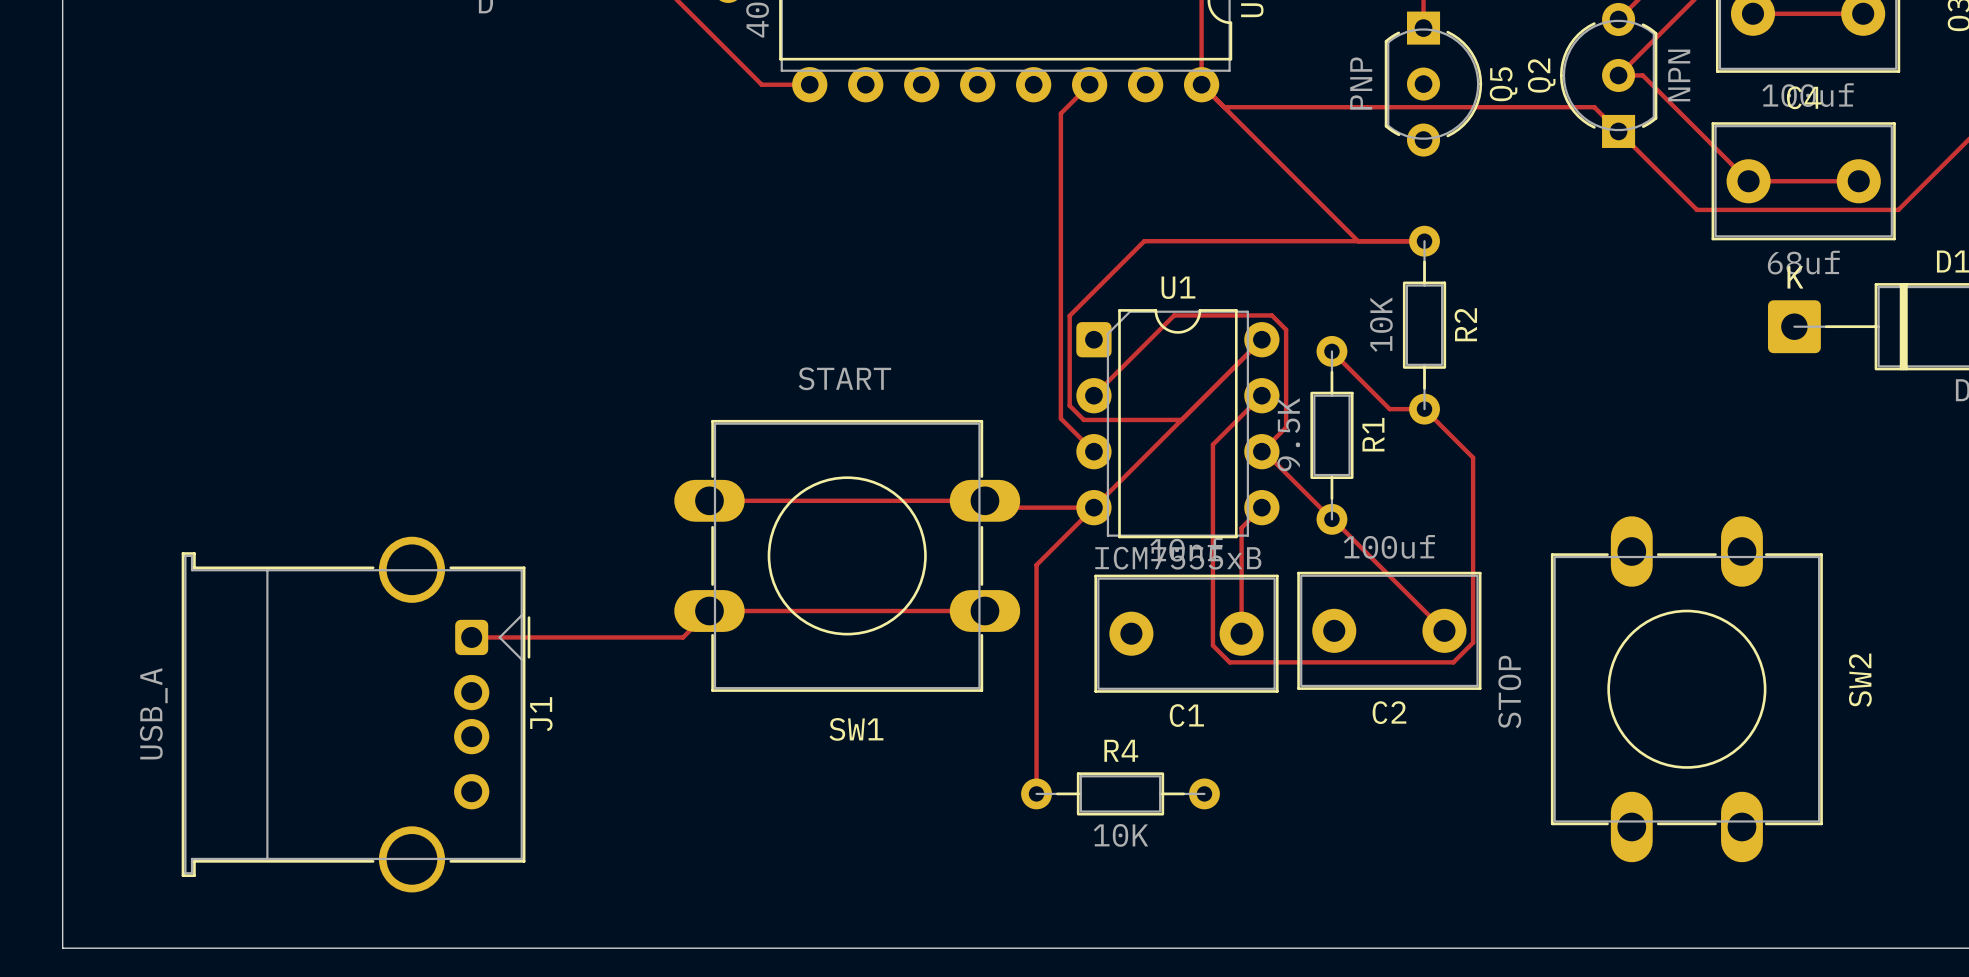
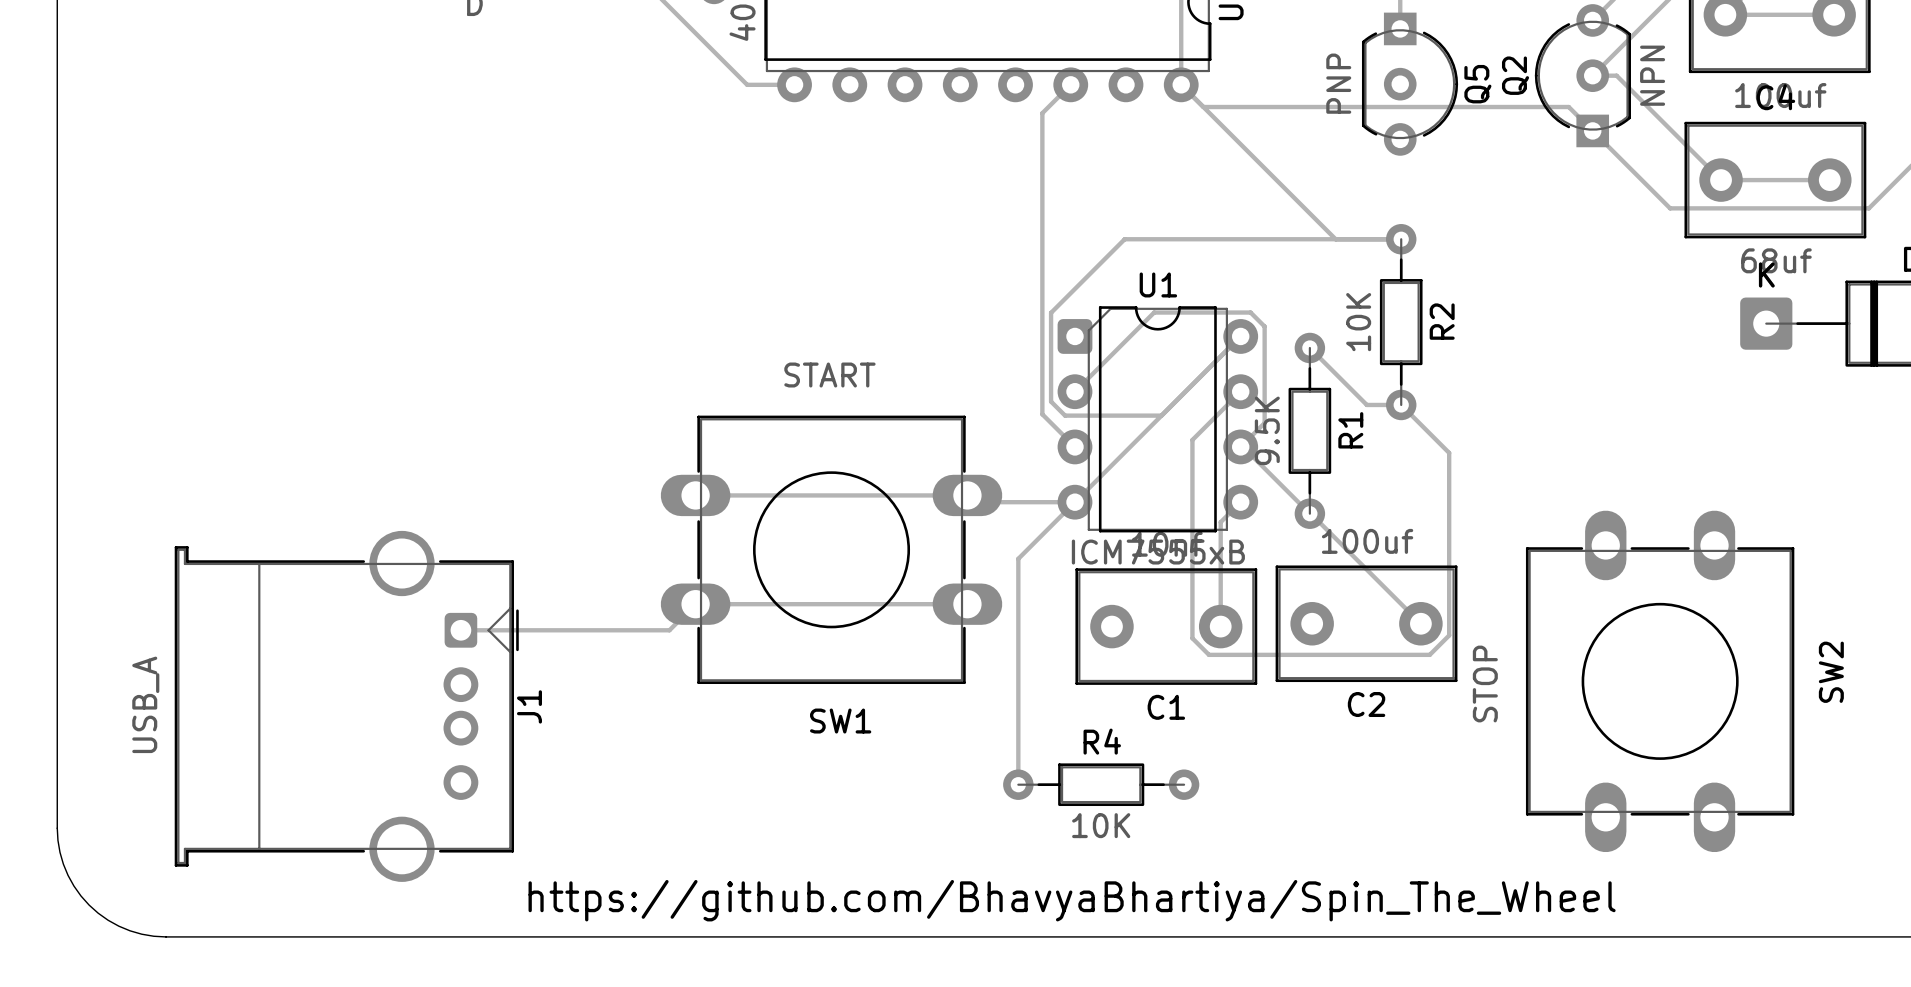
board edge: (62, 838) (62, 948) (172, 948) -> (57, 828) (63, 864) (73, 886) (89, 905) (108, 920) (130, 930) (166, 936)
text: none -> https://github.com/BhavyaBhartiya/Spin_The_Wheel (1072, 900)

